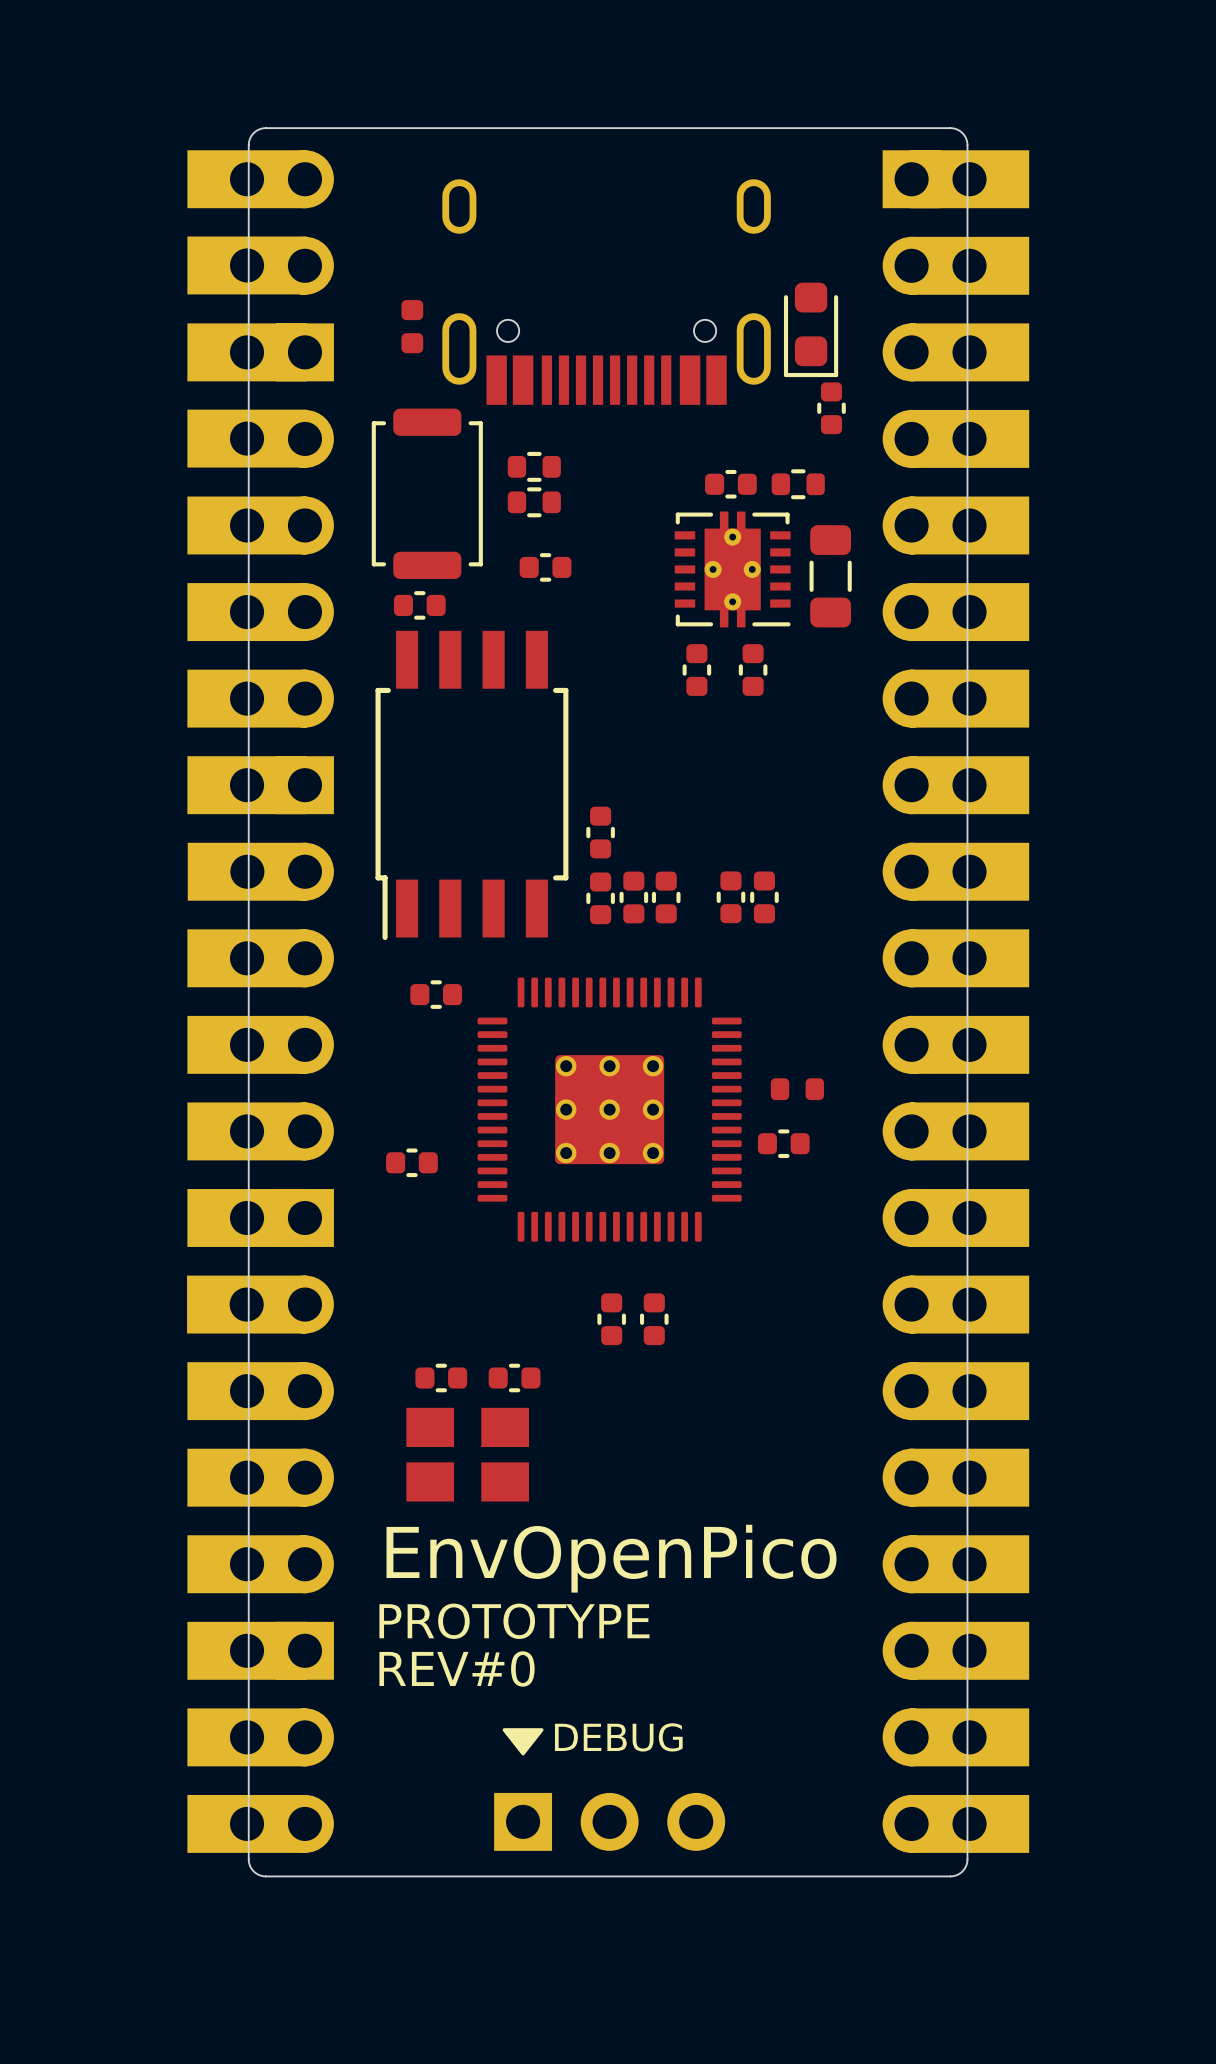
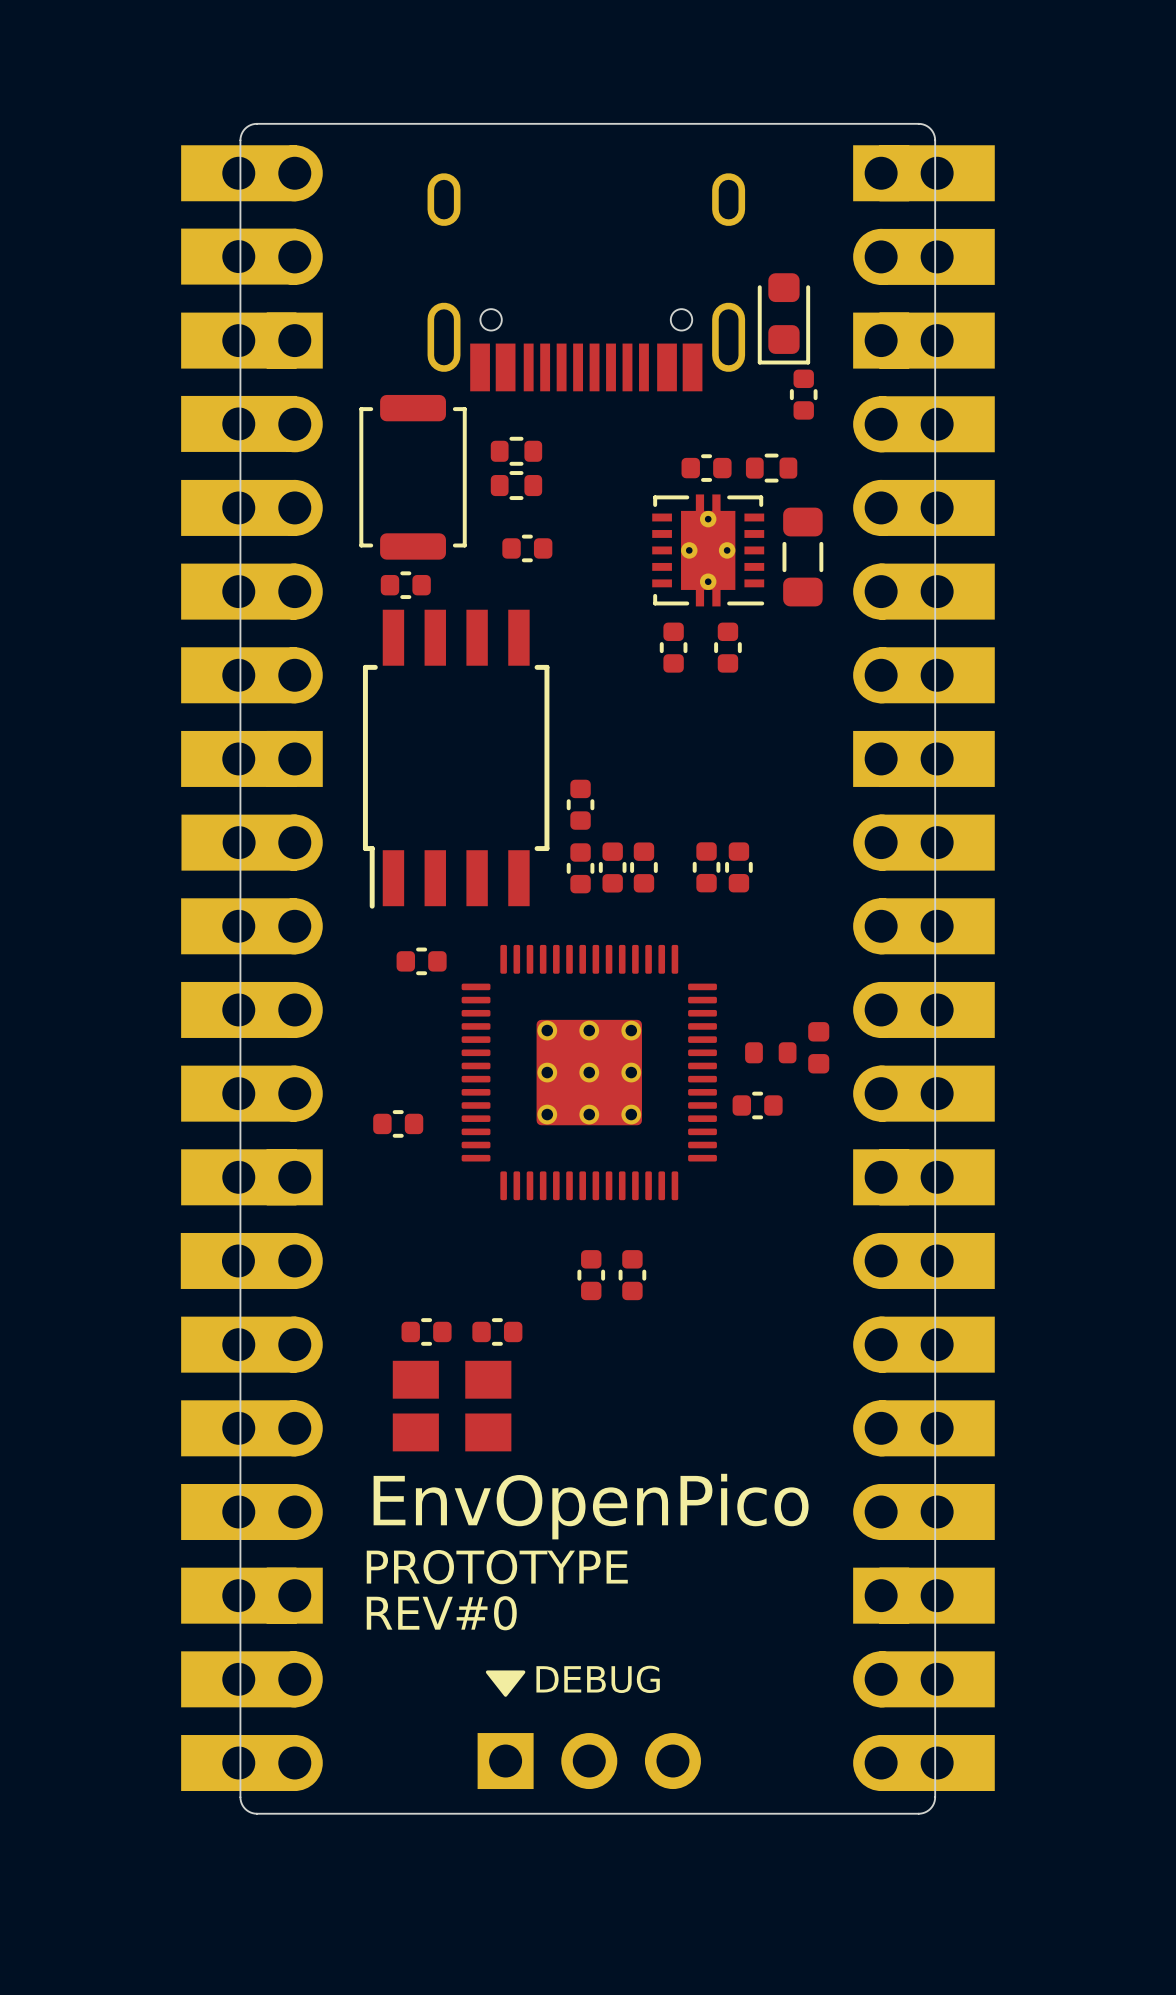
part footprint: [882, 150, 1030, 1853] -> [853, 145, 995, 1792]
part: (412, 326) -> none
part: none -> (818, 1047)

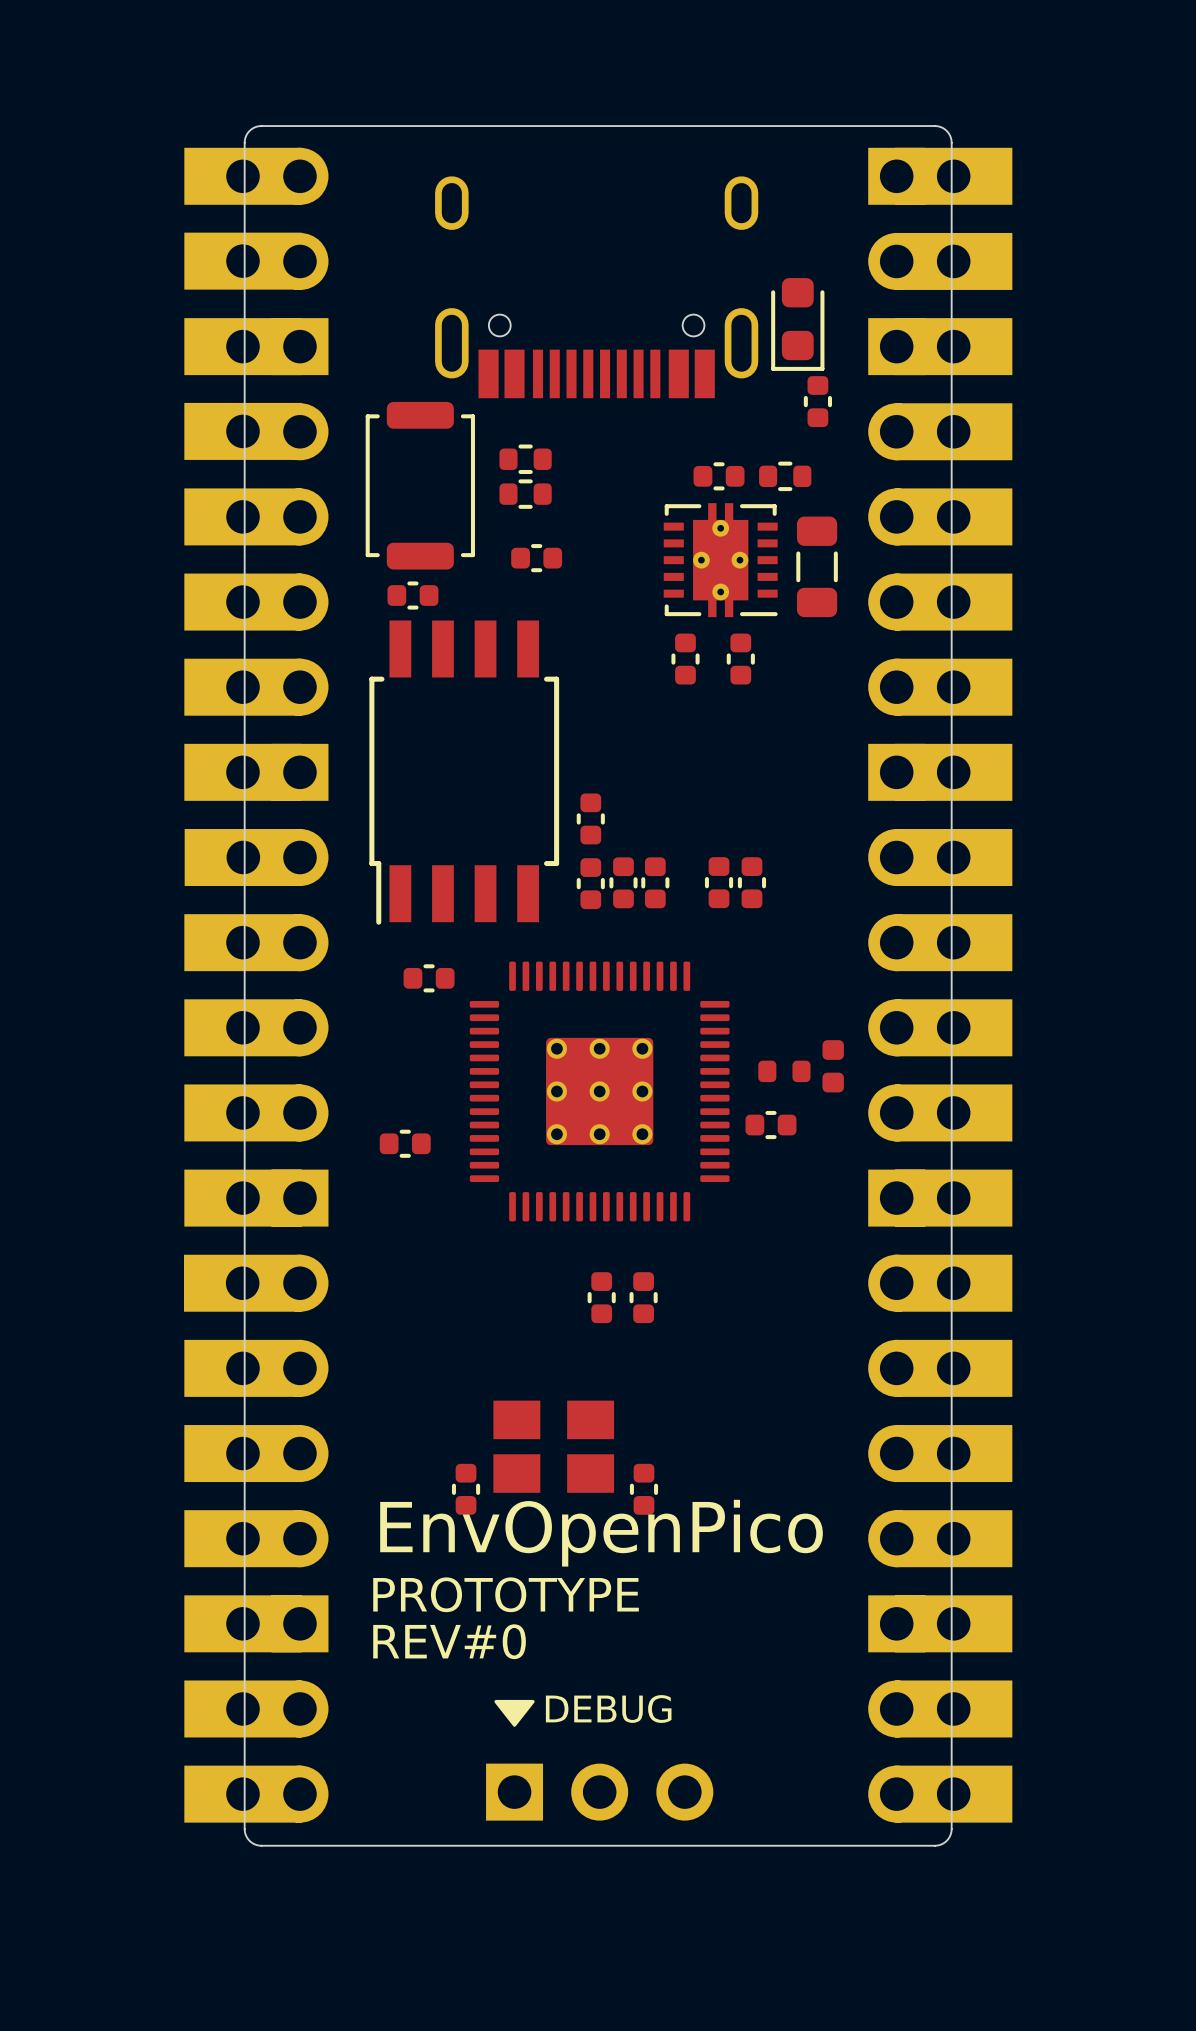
part: (426, 1331) -> none
part: (497, 1331) -> none
part position: (452, 1406) -> (553, 1446)
part: none -> (466, 1489)
part: none -> (643, 1489)

